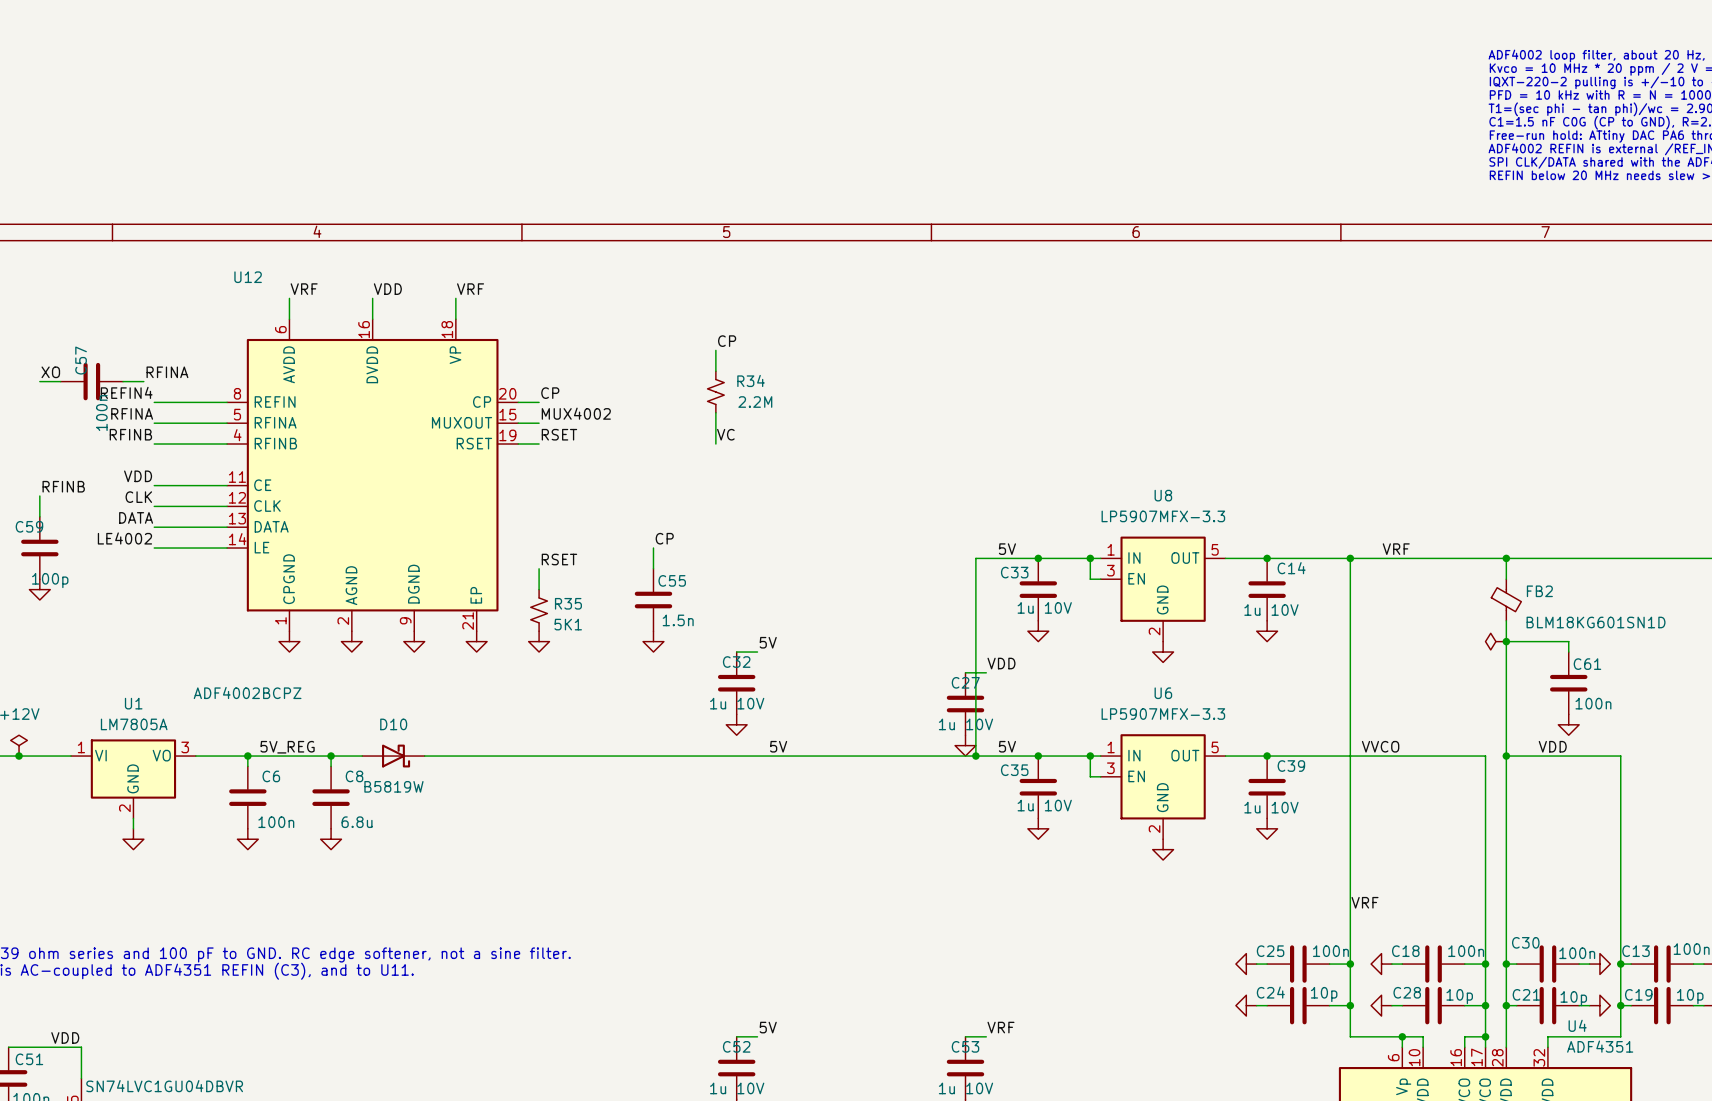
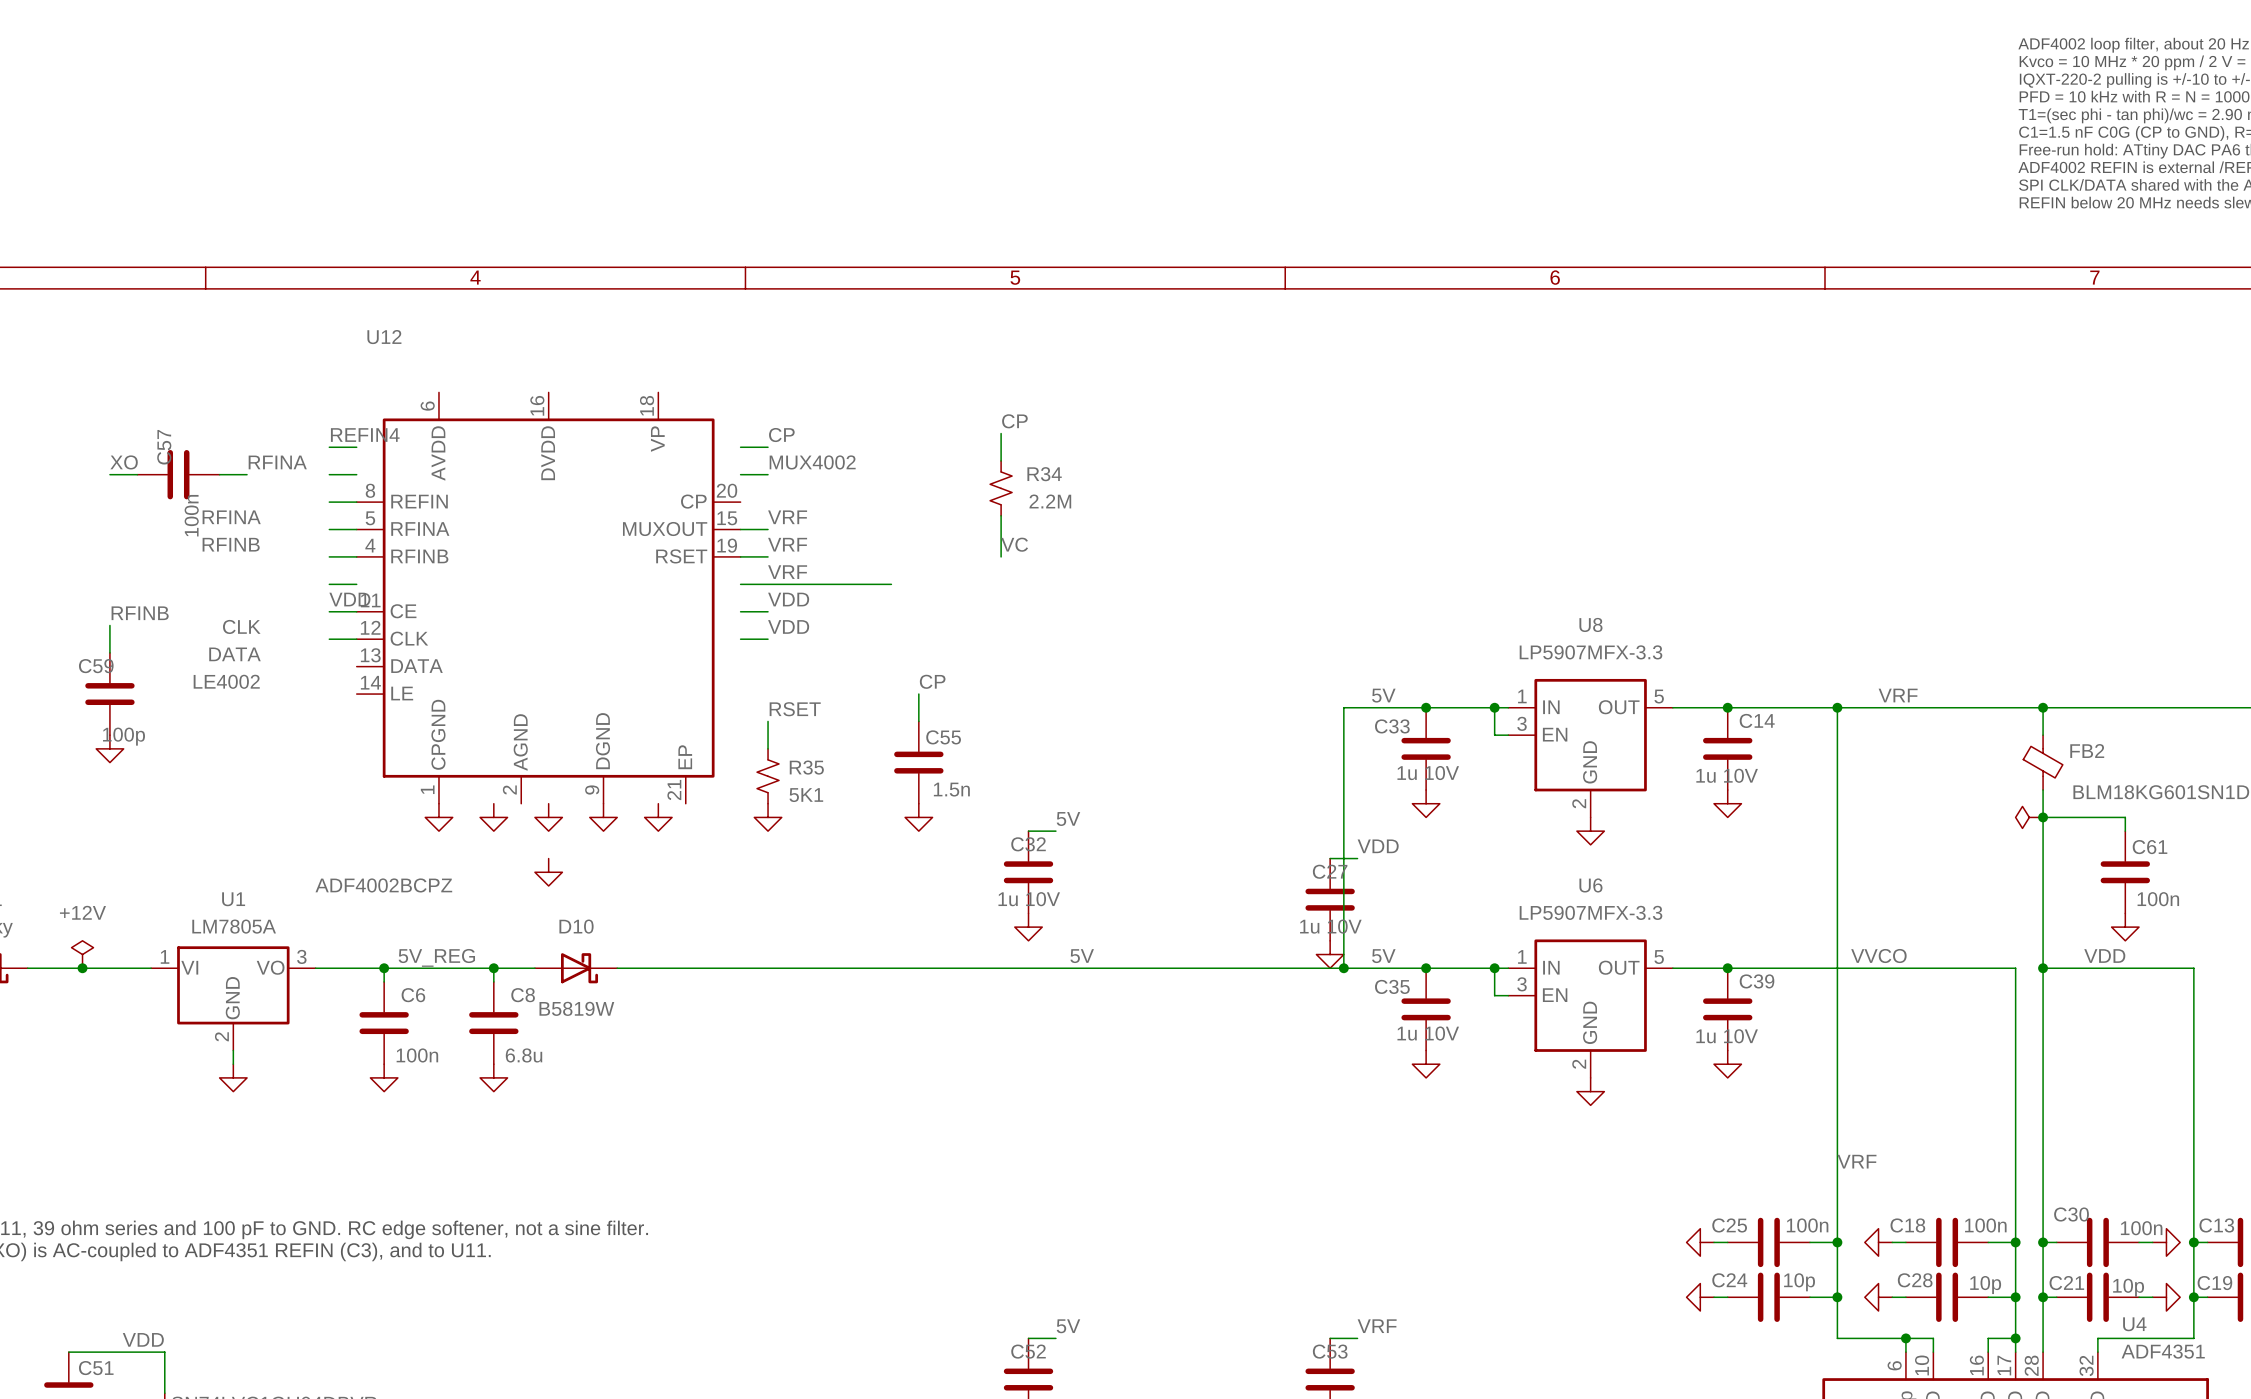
label: VRF (304, 289) -> none
label: VDD (387, 289) -> none
label: VRF (470, 289) -> none
wire: (289, 298) (289, 319) -> none
wire: (372, 298) (372, 319) -> none
wire: (455, 298) (455, 319) -> none
wire: none -> (329, 447) (356, 447)
wire: none -> (740, 447) (768, 447)
label: none -> MUX4002 (812, 462)
wire: none -> (329, 474) (356, 474)
label position: REFIN4 (126, 392) -> REFIN4 (365, 435)
label position: CP (550, 393) -> CP (781, 435)
wire: (154, 402) (206, 402) -> none
wire: (518, 402) (539, 402) -> (740, 474) (768, 474)
label: MUX4002 (576, 413) -> VRF (787, 517)
wire: (154, 423) (206, 423) -> none
label: RSET (559, 434) -> VRF (787, 544)
wire: (154, 444) (206, 444) -> none
label: none -> VRF (787, 572)
wire: none -> (329, 584) (356, 584)
wire: none -> (740, 584) (891, 584)
label position: VDD (138, 476) -> VDD (349, 599)
label: none -> VDD (788, 599)
wire: (154, 485) (206, 485) -> none
wire: none -> (740, 611) (768, 611)
label: none -> VDD (788, 626)
wire: (154, 506) (206, 506) -> none
wire: none -> (740, 639) (768, 639)
wire: (154, 527) (227, 527) -> none
wire: (154, 548) (227, 548) -> none
power symbol: none -> (493, 817)
power symbol: (351, 641) -> none
power symbol: none -> (548, 817)
power symbol position: (476, 641) -> (658, 817)
power symbol: none -> (548, 872)

